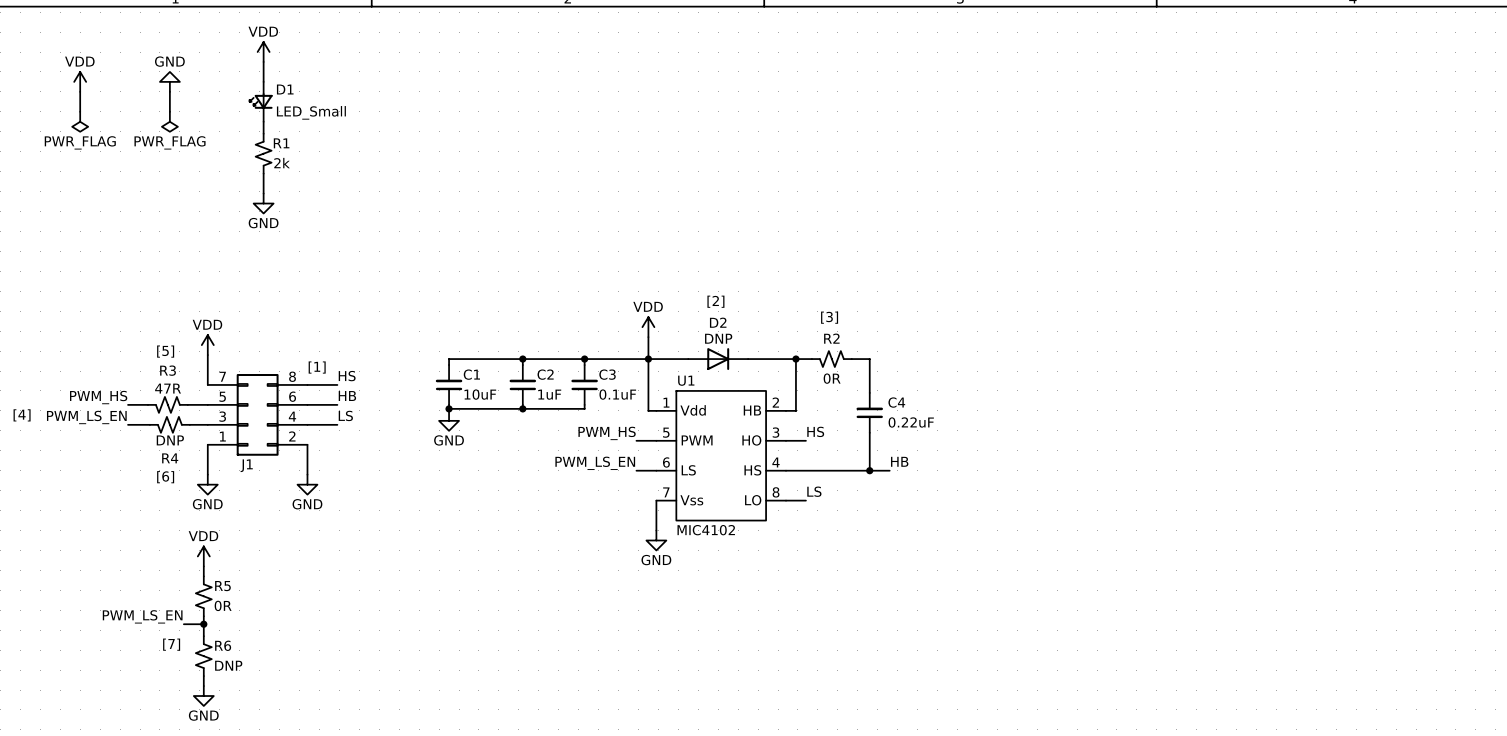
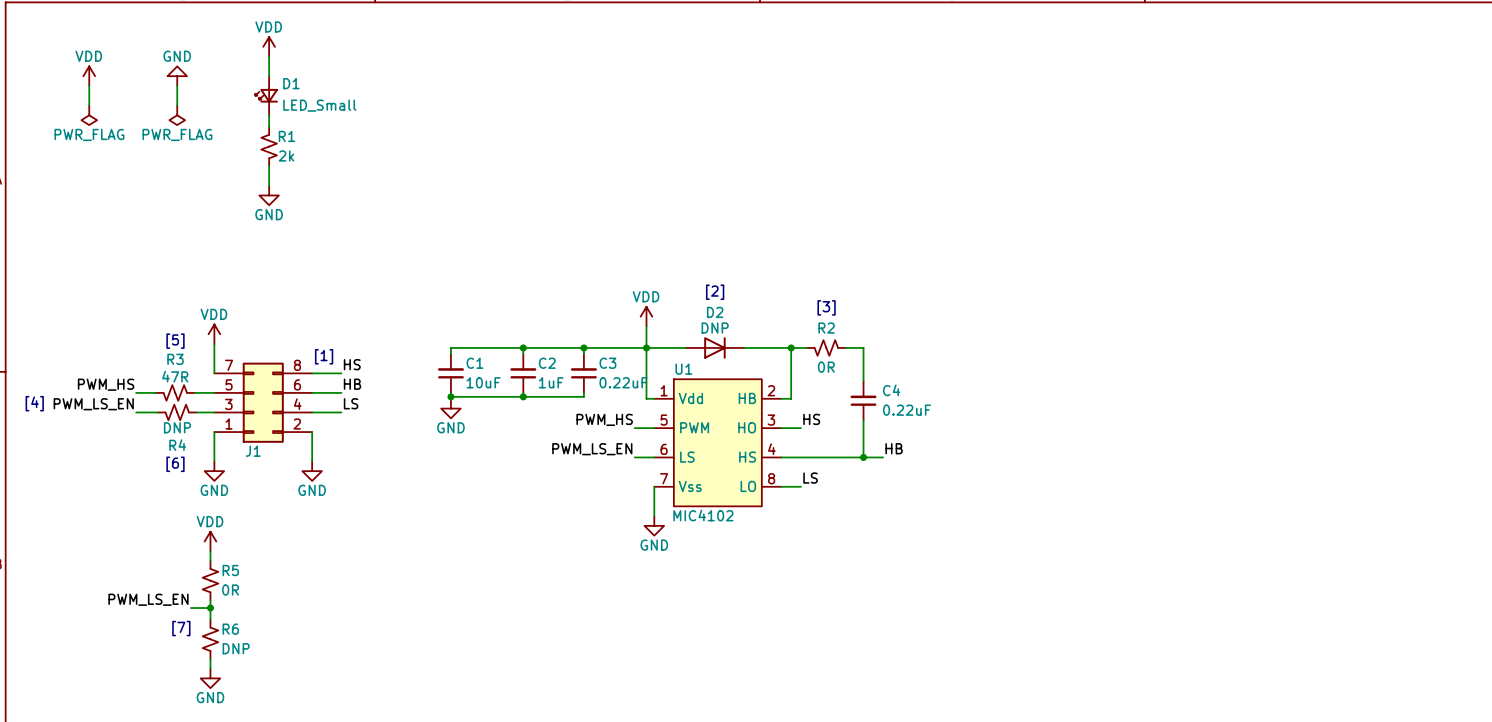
C3 value: 0.1uF (617, 394) -> 0.22uF (623, 382)

